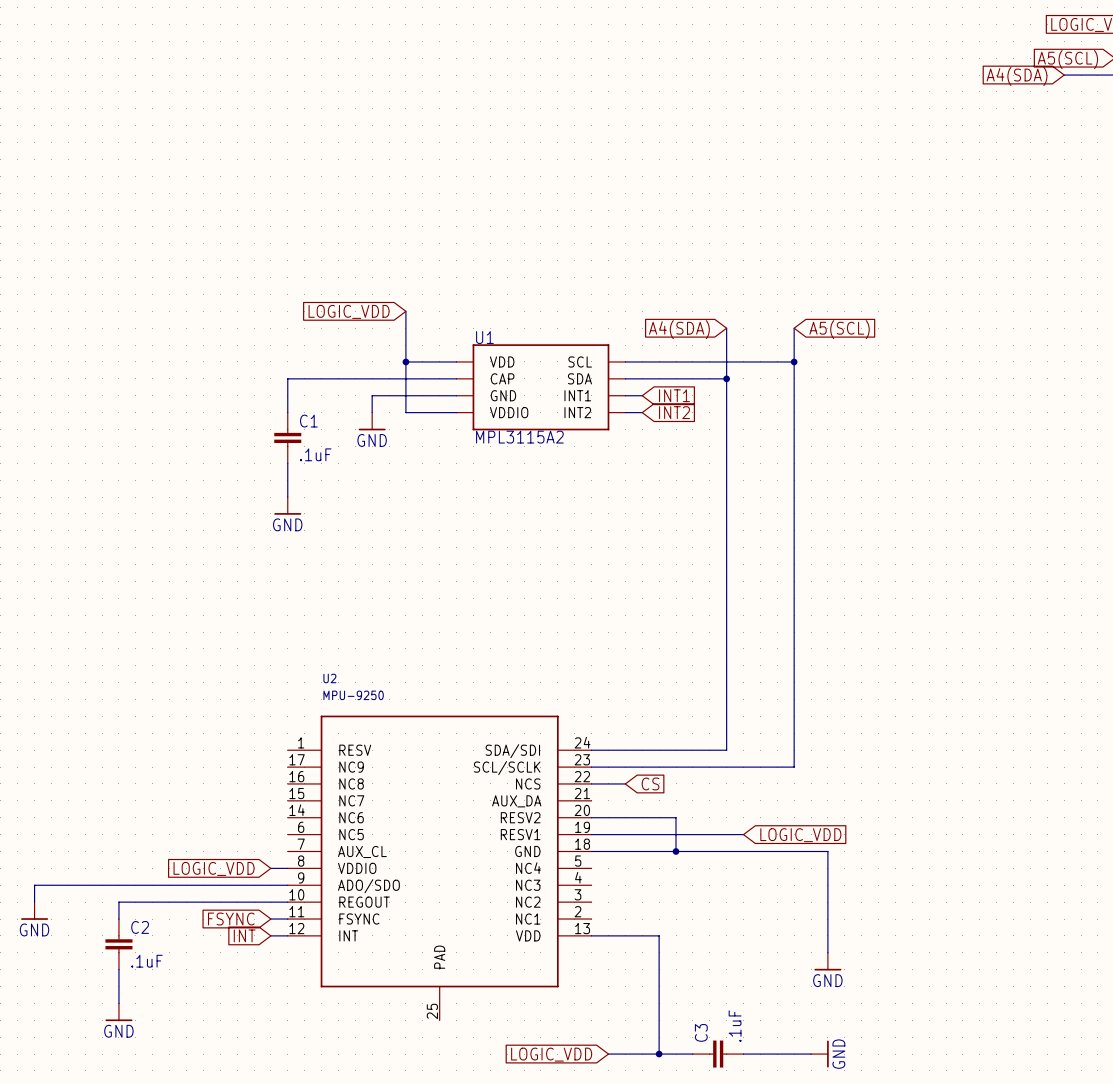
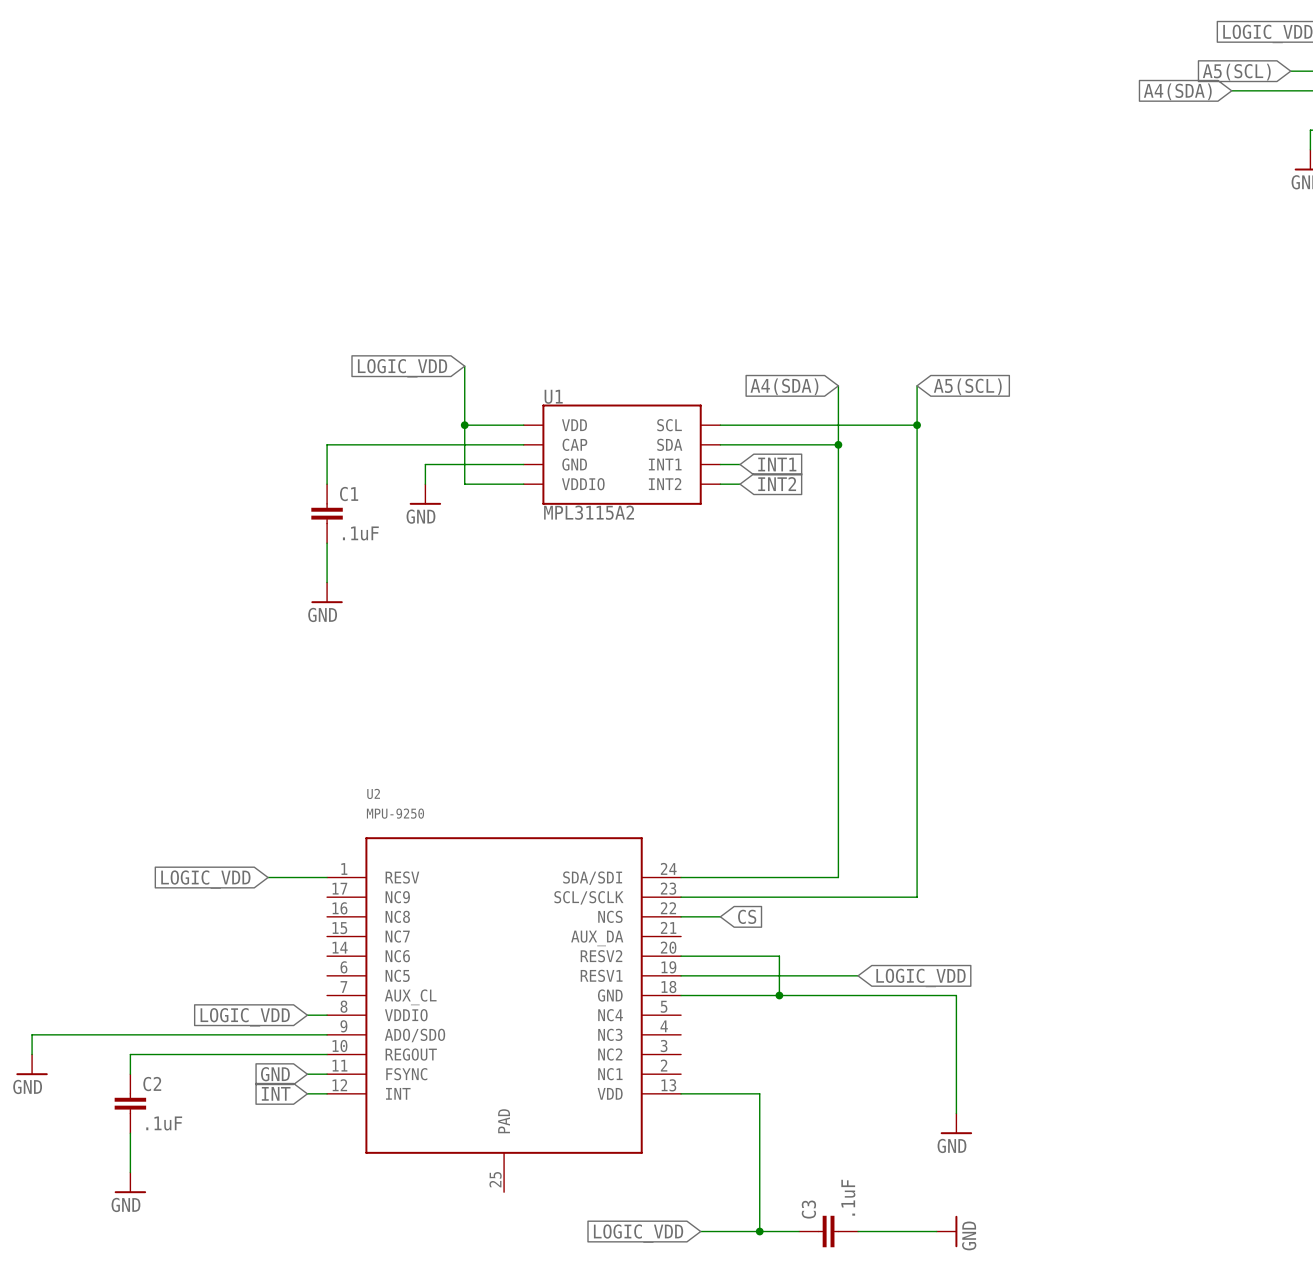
global label: none -> LOGIC_VDD (205, 879)
wire: none -> (268, 877) (327, 877)
global label: FSYNC (231, 919) -> GND (275, 1074)

